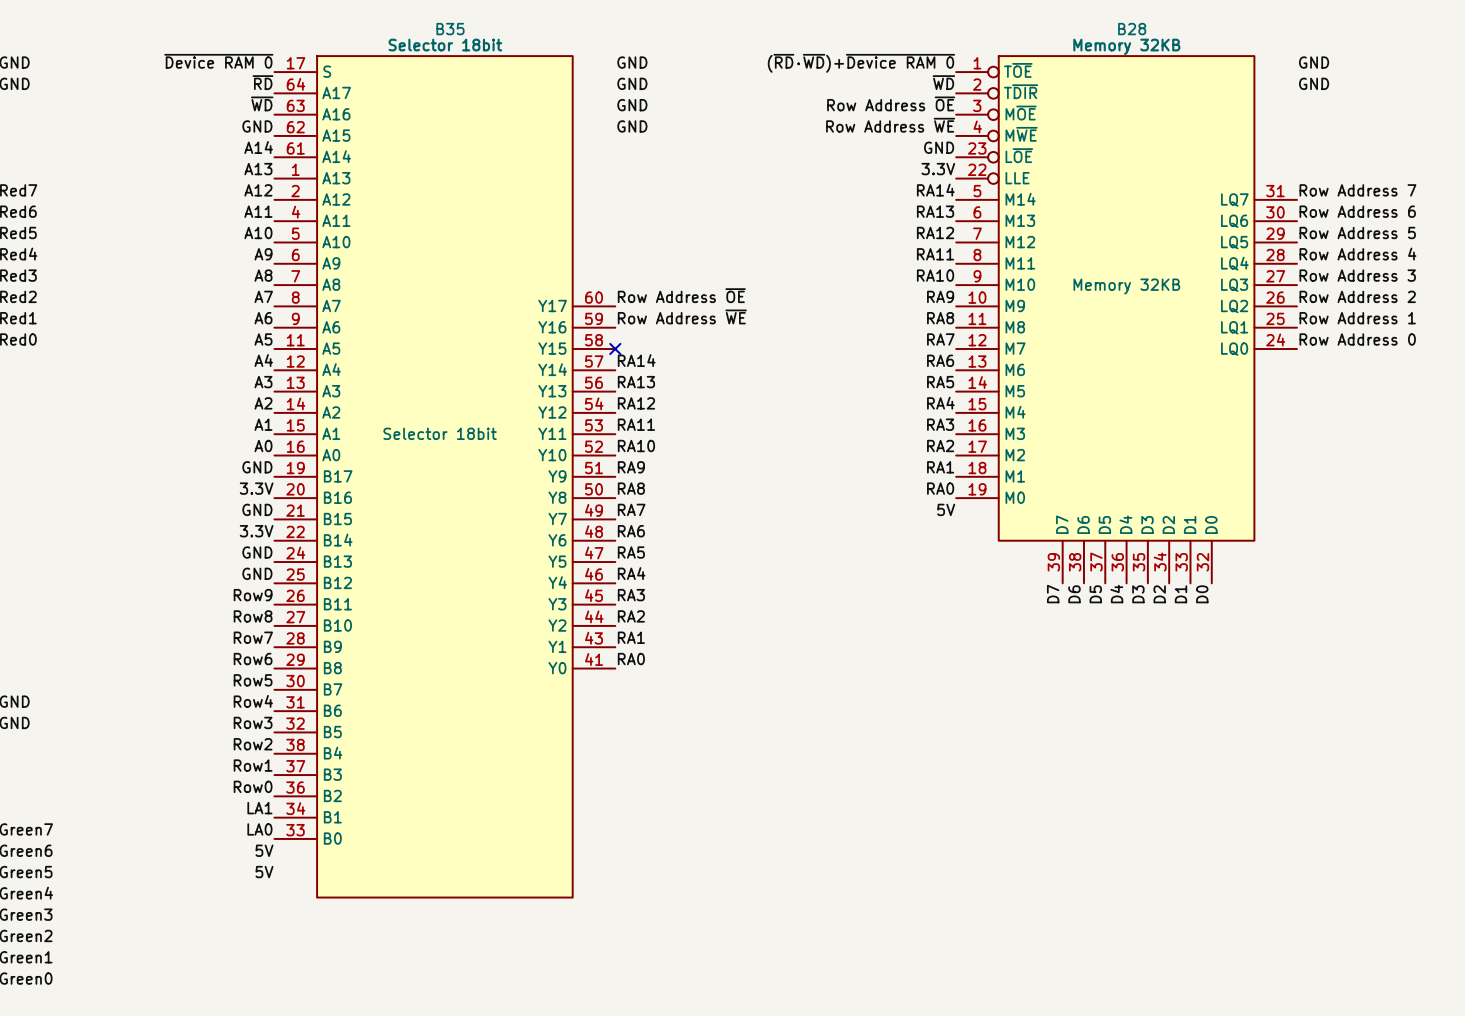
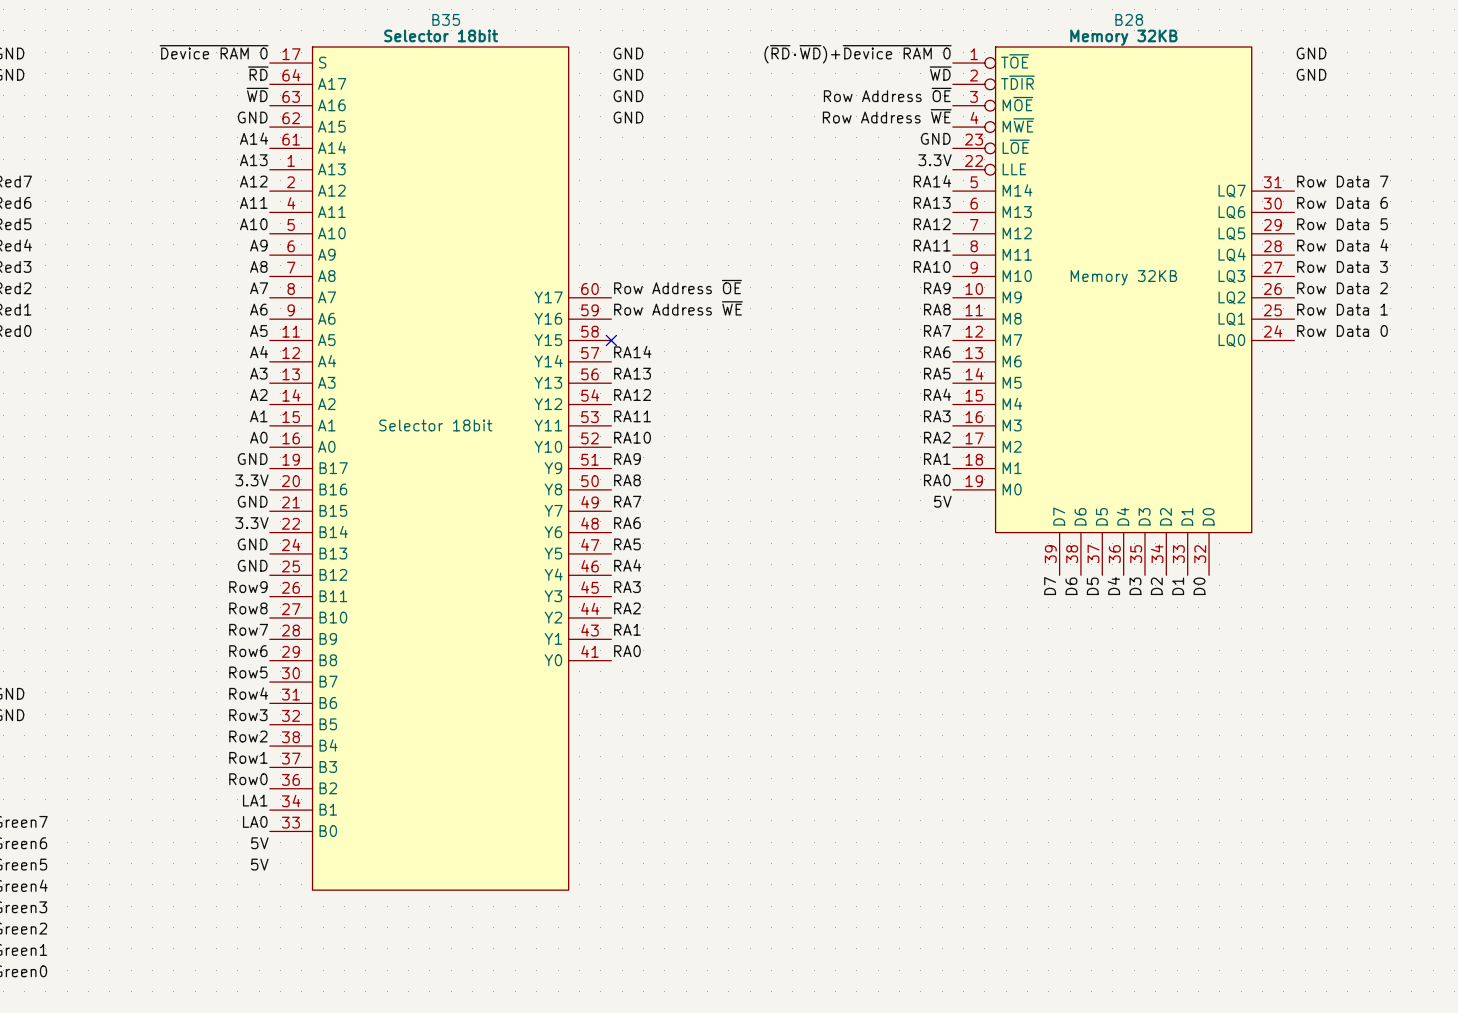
label: Row Address 7 (1357, 190) -> Row Data 7 (1342, 181)
label: Row Address 6 (1357, 211) -> Row Data 6 (1342, 202)
label: Row Address 5 (1357, 232) -> Row Data 5 (1342, 224)
label: Row Address 4 (1357, 254) -> Row Data 4 (1342, 245)
label: Row Address 3 (1357, 275) -> Row Data 3 (1342, 266)
label: Row Address 2 (1357, 296) -> Row Data 2 (1342, 288)
label: Row Address 1 (1357, 318) -> Row Data 1 (1342, 309)
label: Row Address 0 (1357, 339) -> Row Data 0 (1342, 330)

